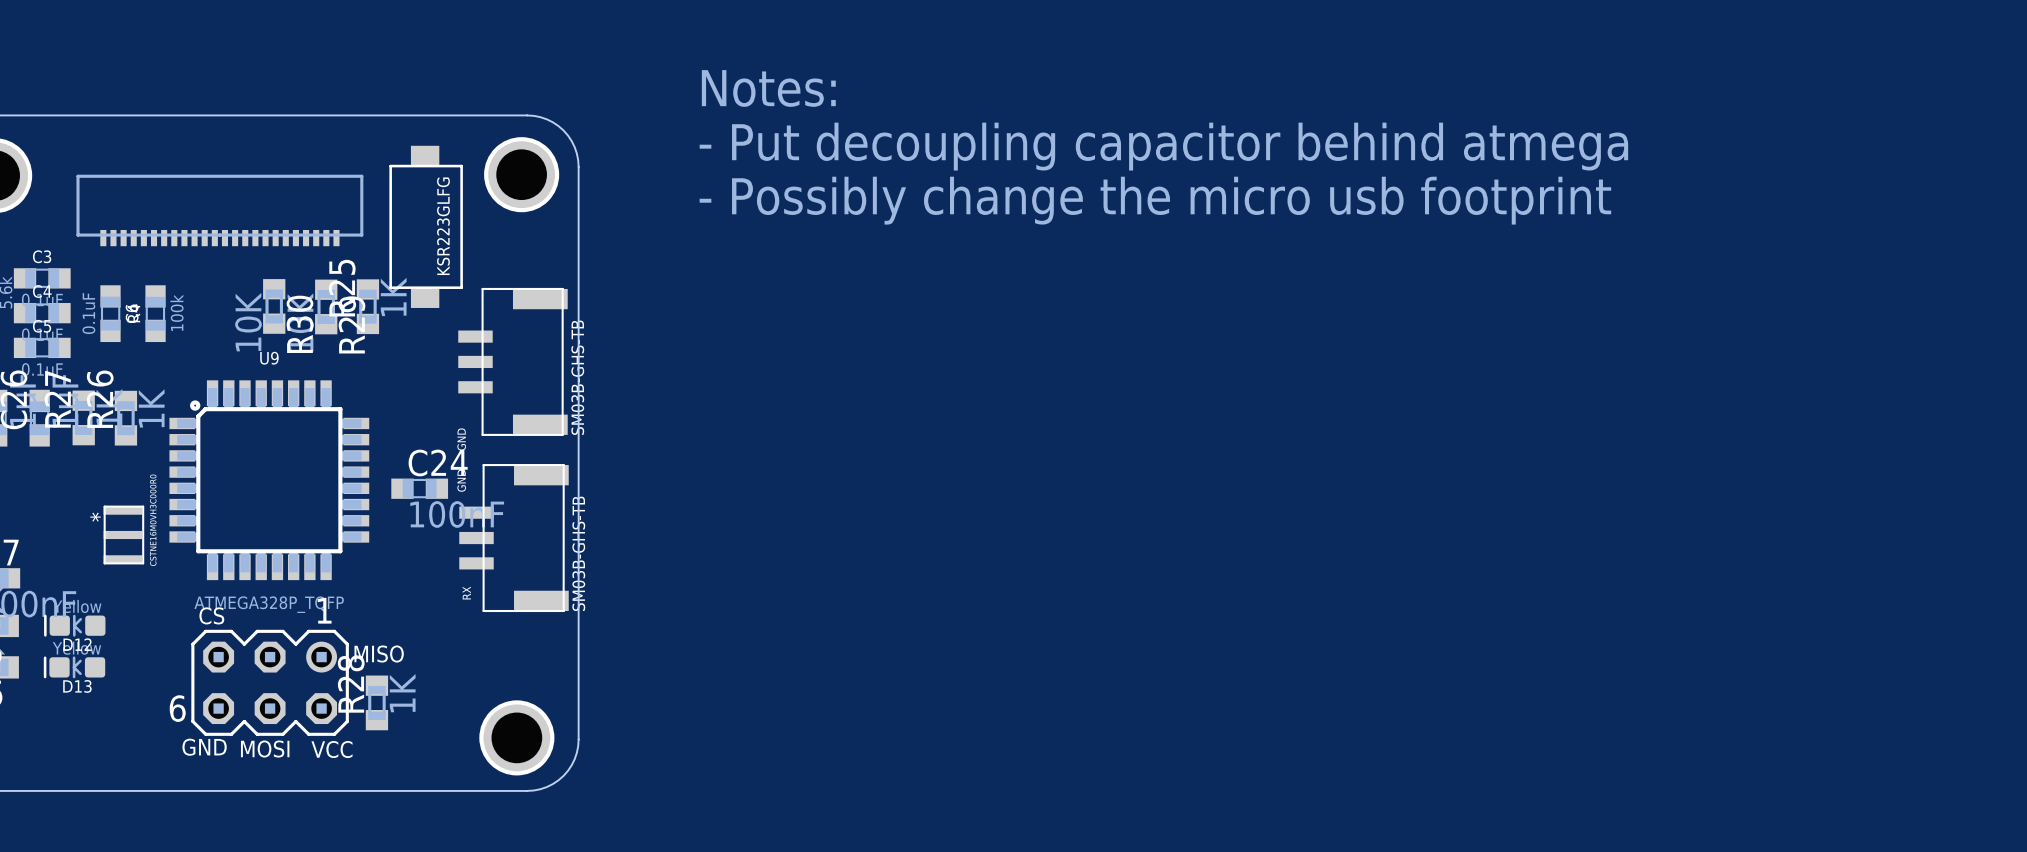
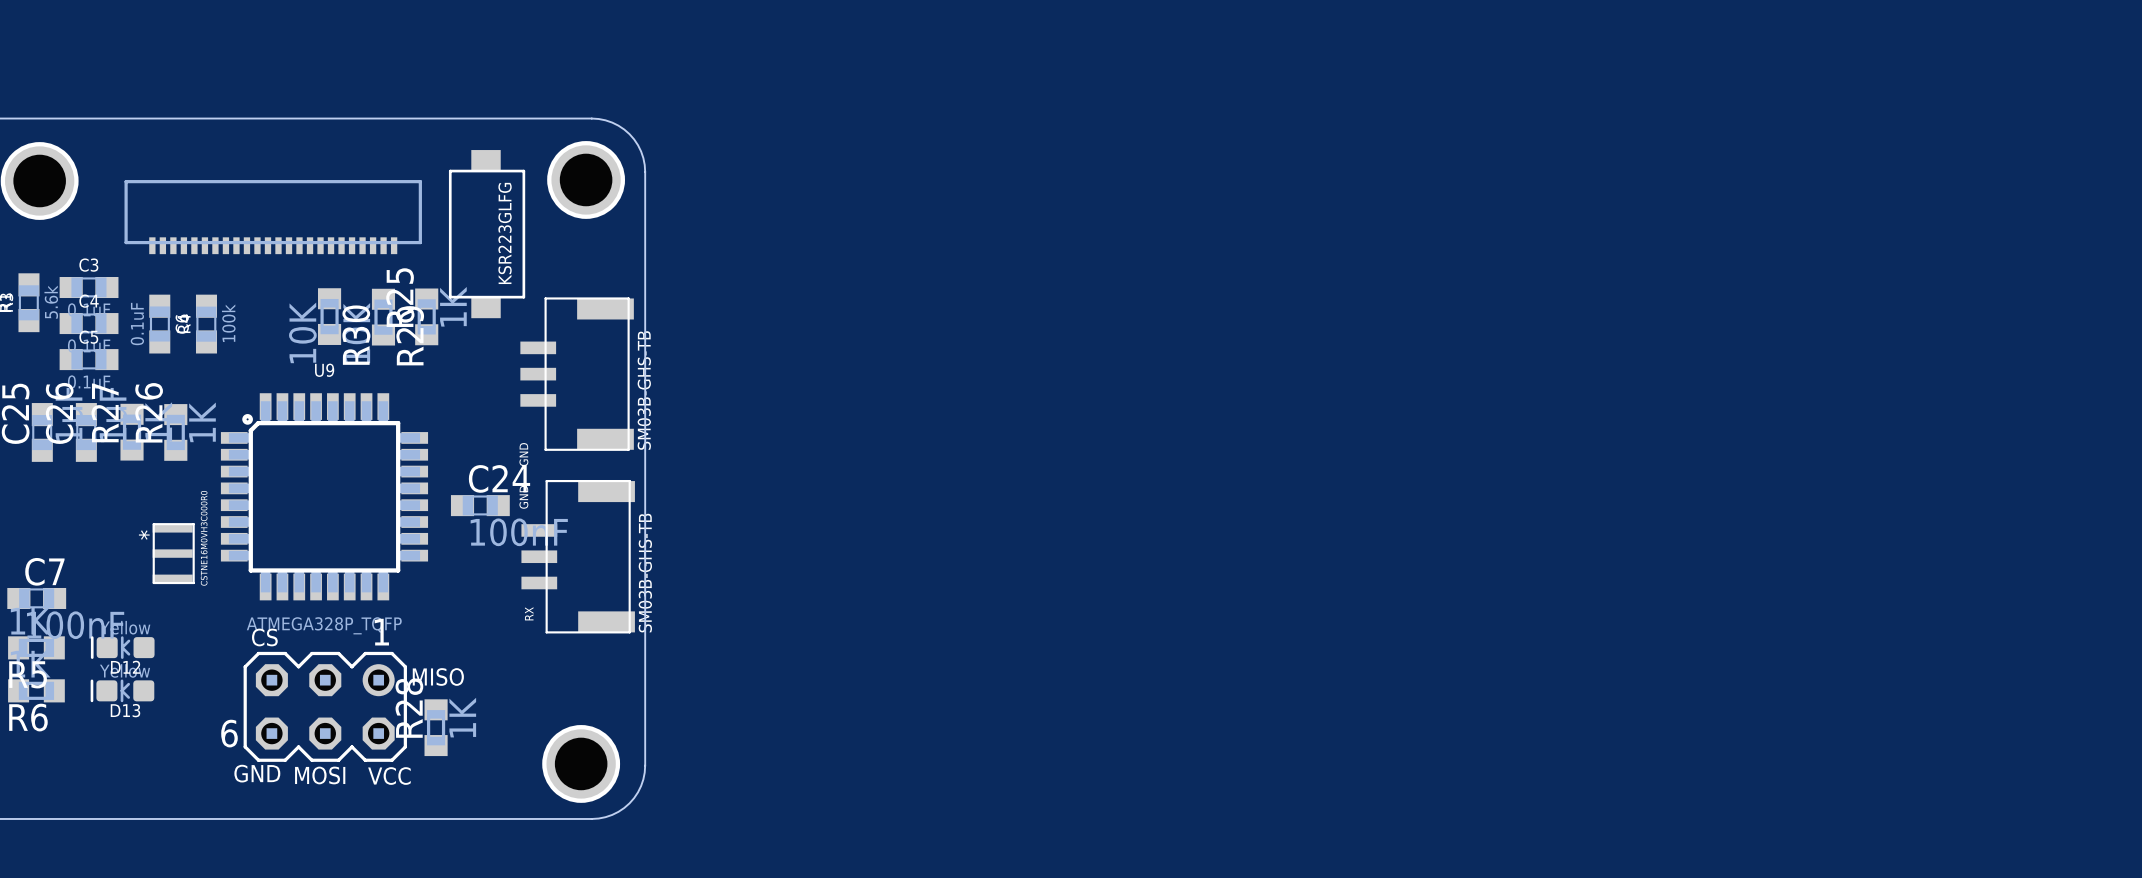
text: Notes: (768, 88) -> none
text: - Put decoupling capacitor behind atmega (1163, 146) -> none
text: - Possibly change the micro usb footprint (1155, 200) -> none

